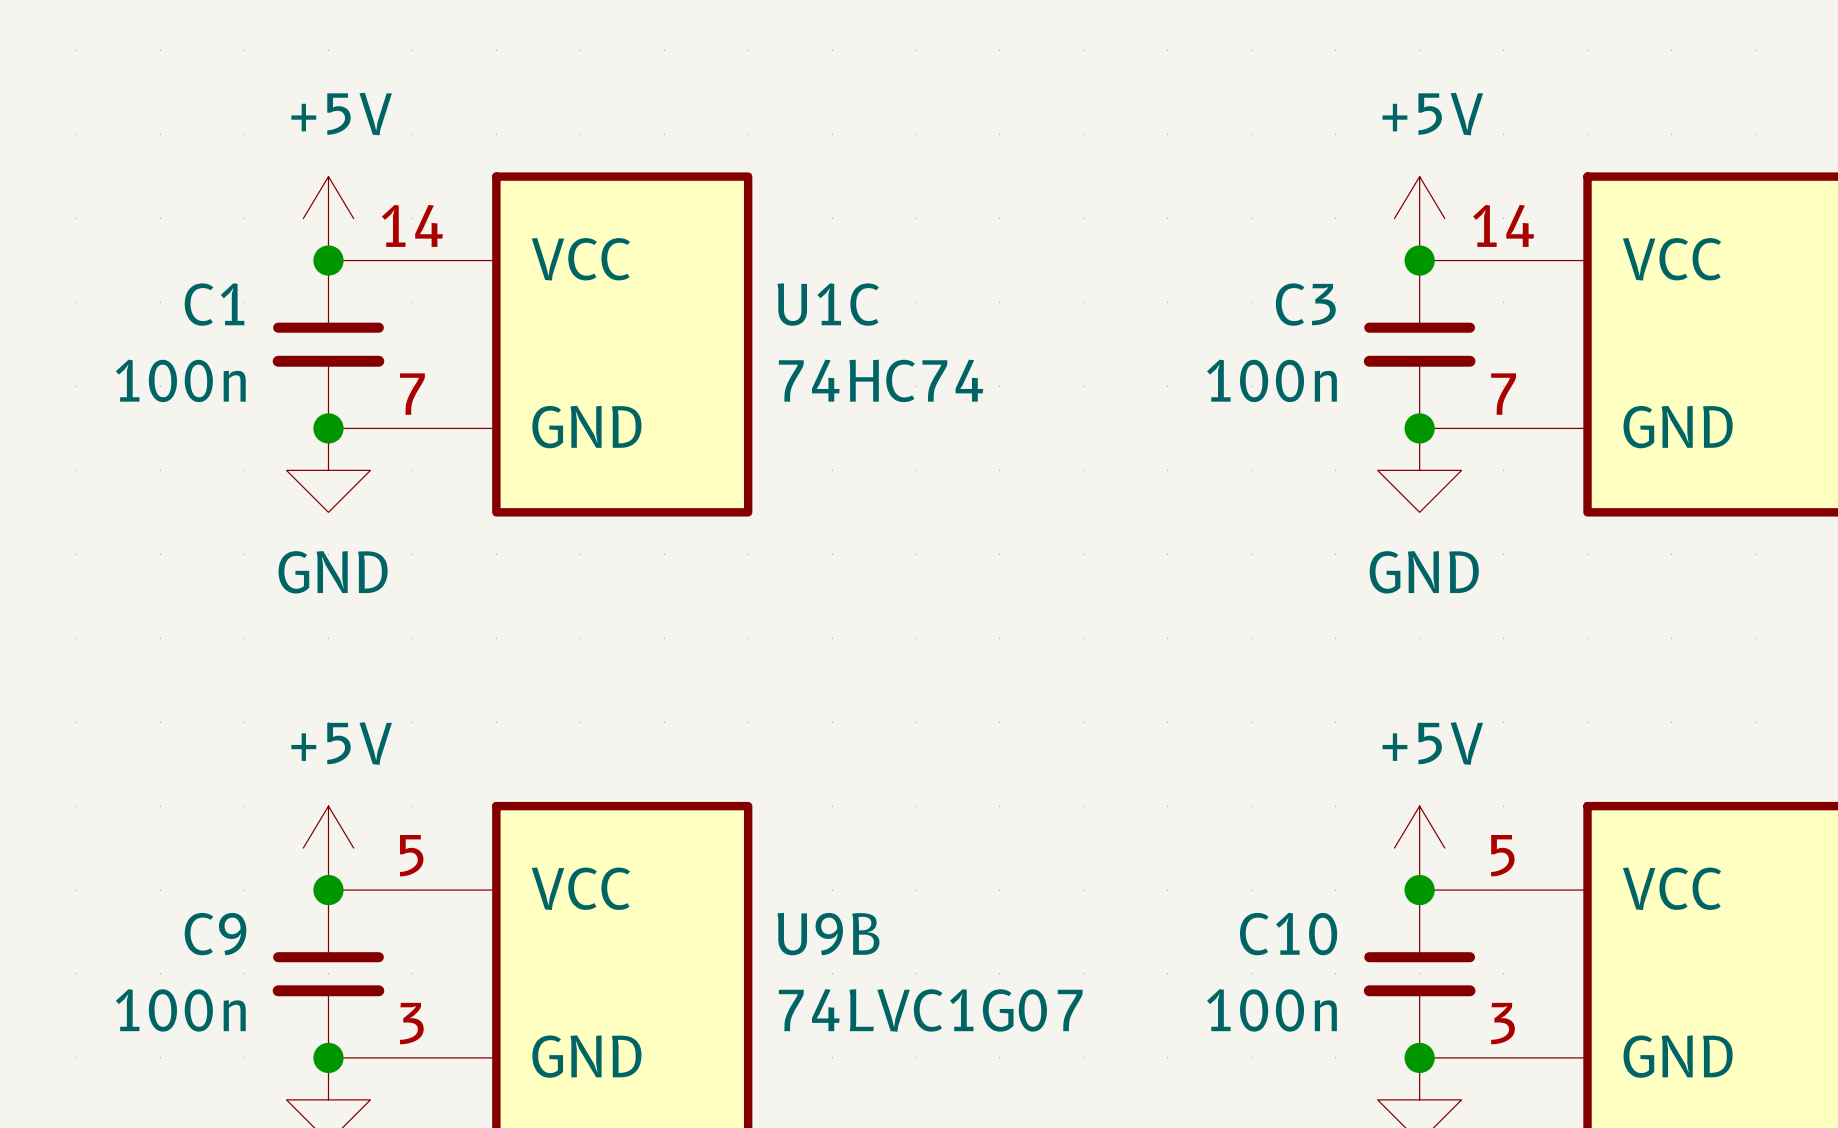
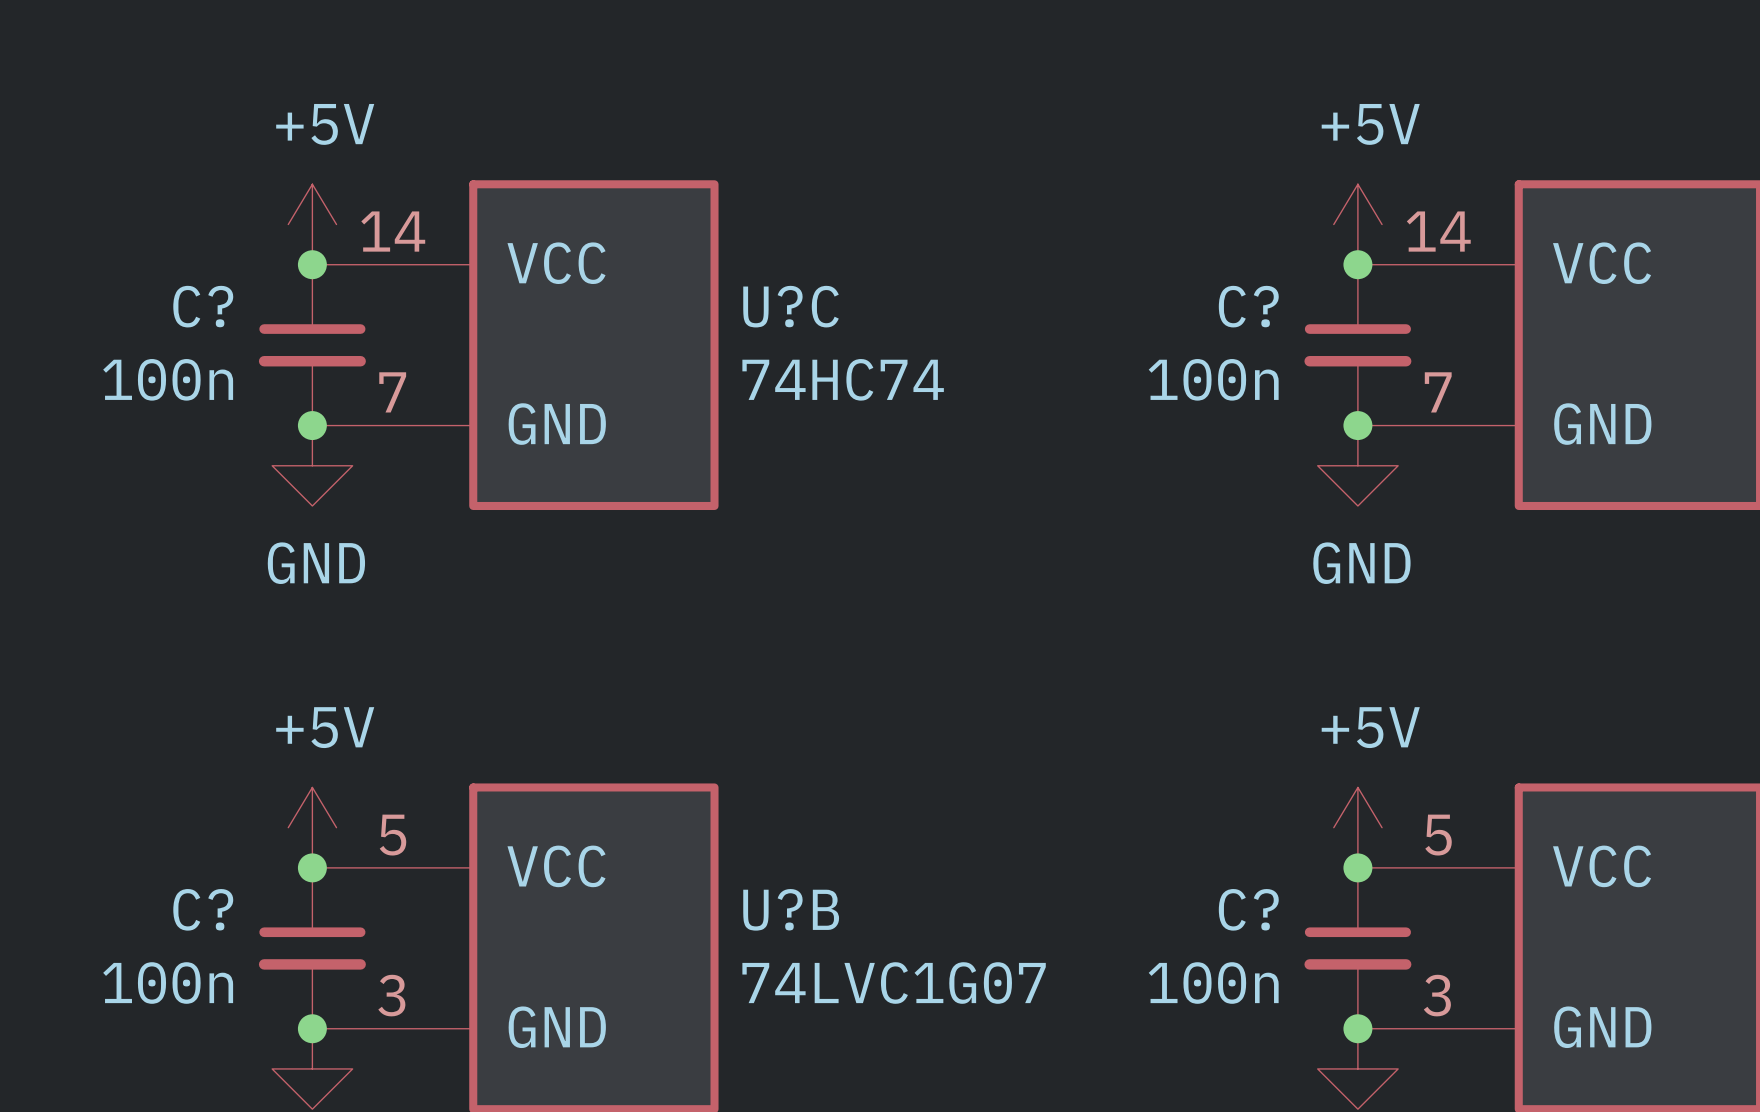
C1 name: C1 (214, 304) -> C? (203, 306)
U1C name: U1C (828, 304) -> U?C (791, 306)
C3 name: C3 (1305, 304) -> C? (1248, 306)
C9 name: C9 (215, 934) -> C? (203, 909)
U9B name: U9B (828, 934) -> U?B (791, 909)
C10 name: C10 (1288, 934) -> C? (1248, 909)

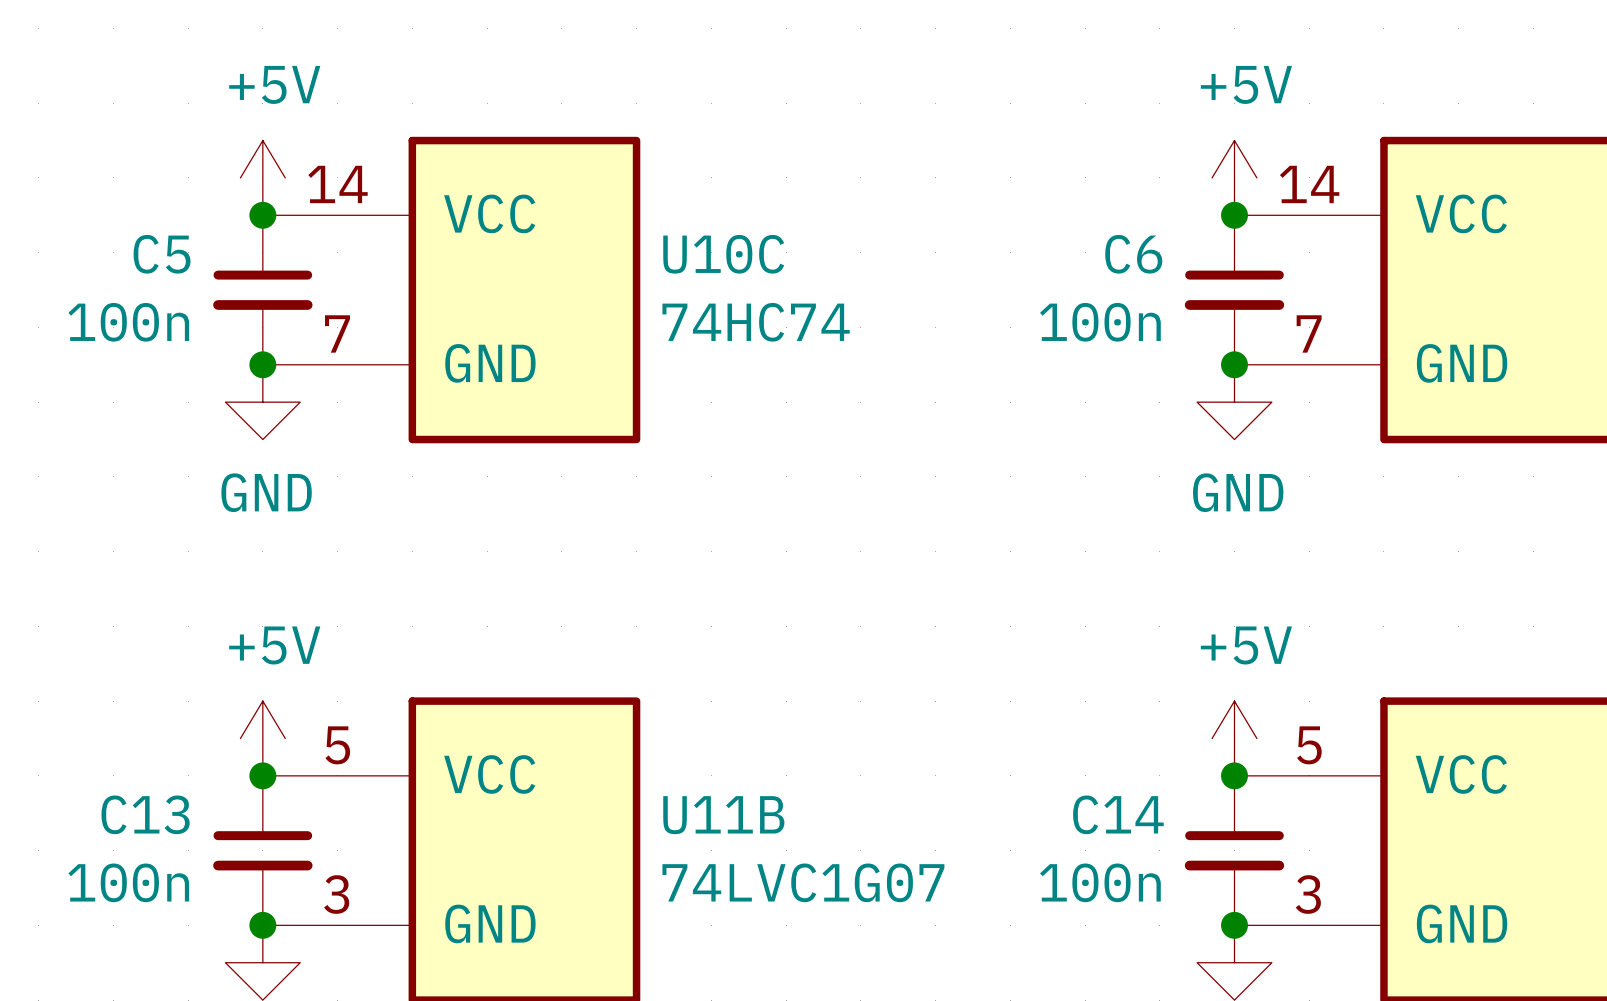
C? name: C? (203, 306) -> C5 (162, 254)
U?C name: U?C (791, 306) -> U10C (723, 254)
C? name: C? (1248, 306) -> C6 (1133, 254)
C? name: C? (203, 909) -> C13 (145, 814)
U?B name: U?B (791, 909) -> U11B (723, 815)
C? name: C? (1248, 909) -> C14 (1118, 814)

